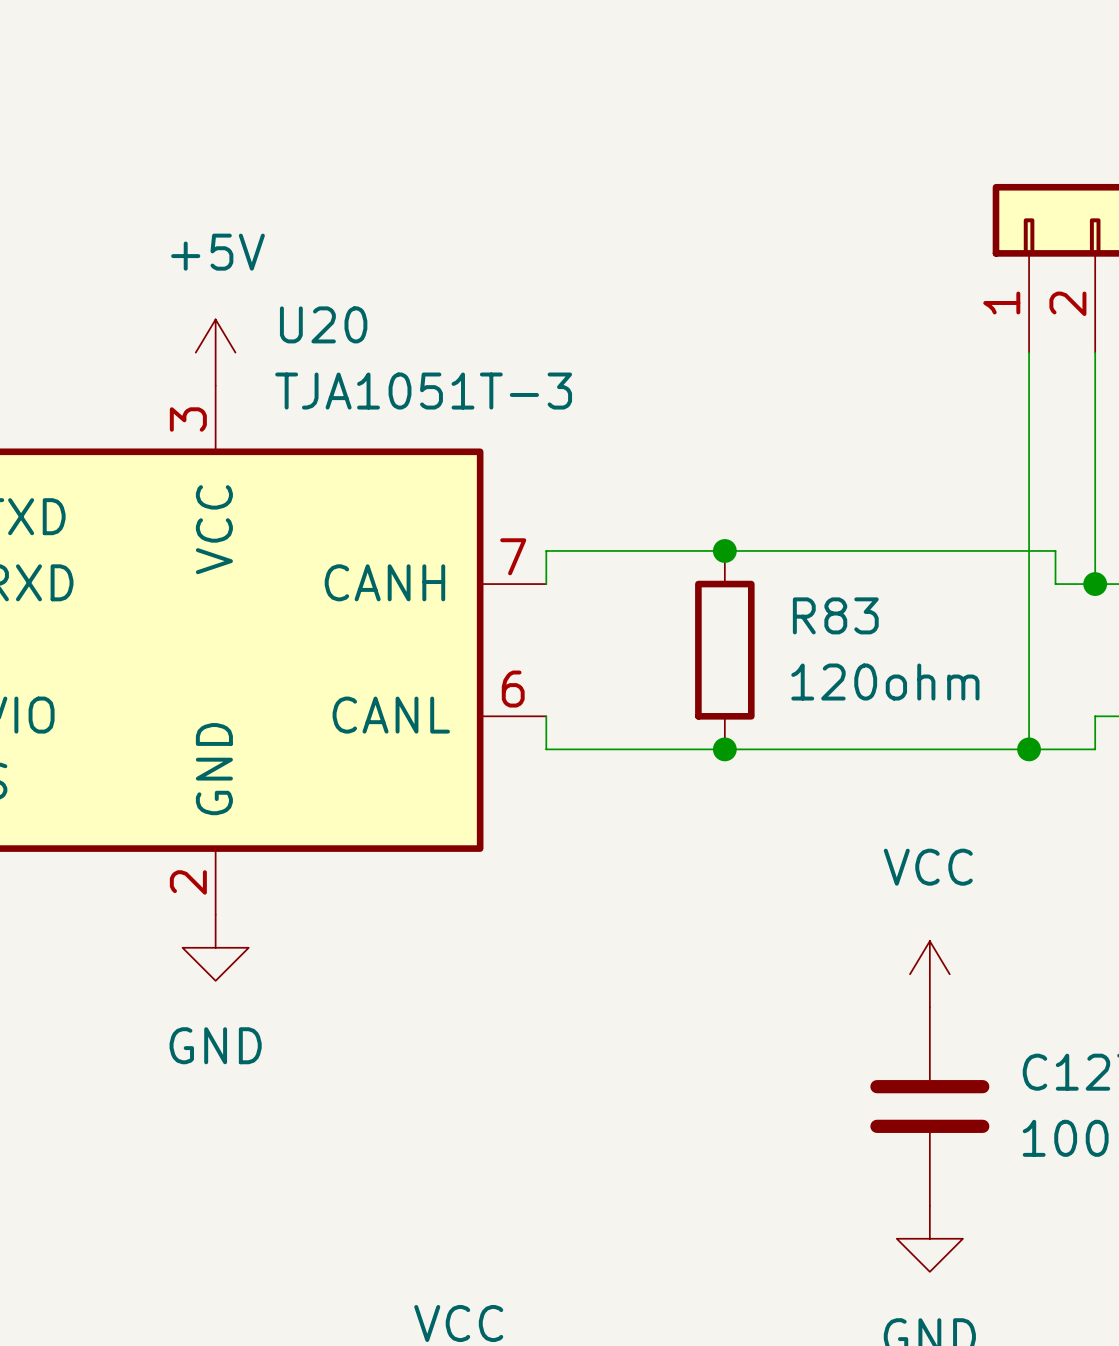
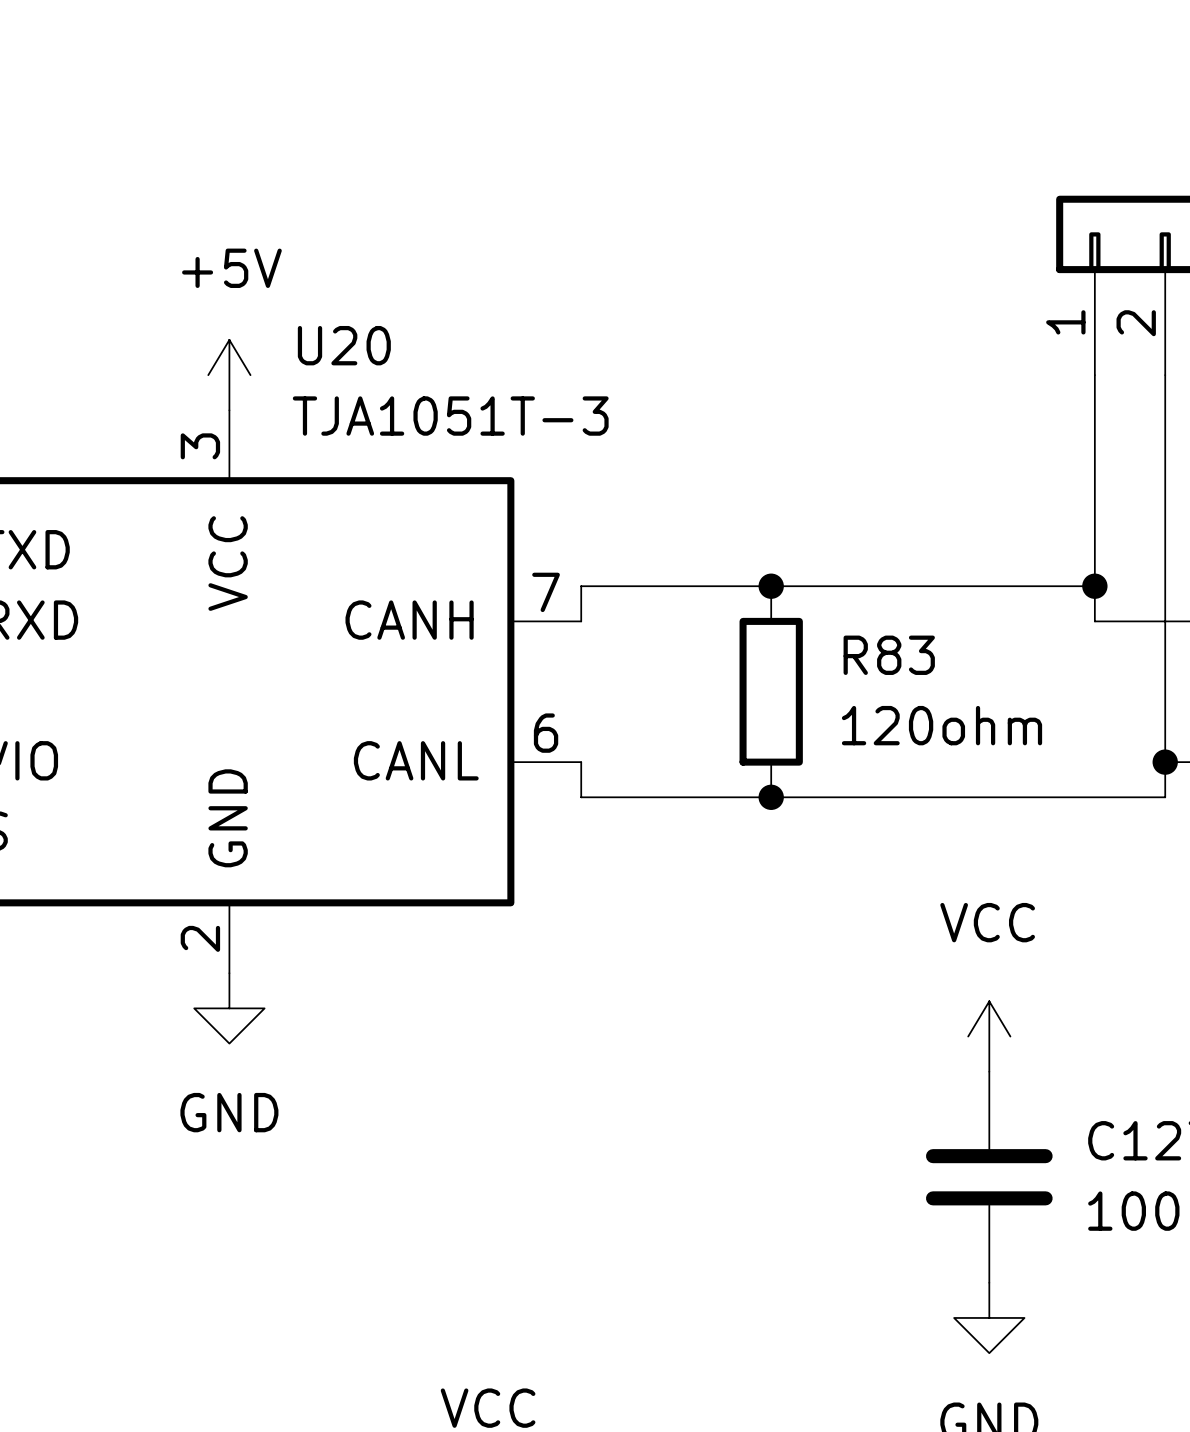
wire: (1029, 550) (1055, 550) (1055, 584) -> (1094, 621) (1123, 621)
junction: none -> (1094, 586)
wire: (1029, 584) (1029, 749) -> none
wire: none -> (1165, 621) (1165, 762)
junction: (1095, 584) -> none
junction: none -> (1165, 762)
junction: (1029, 749) -> none

